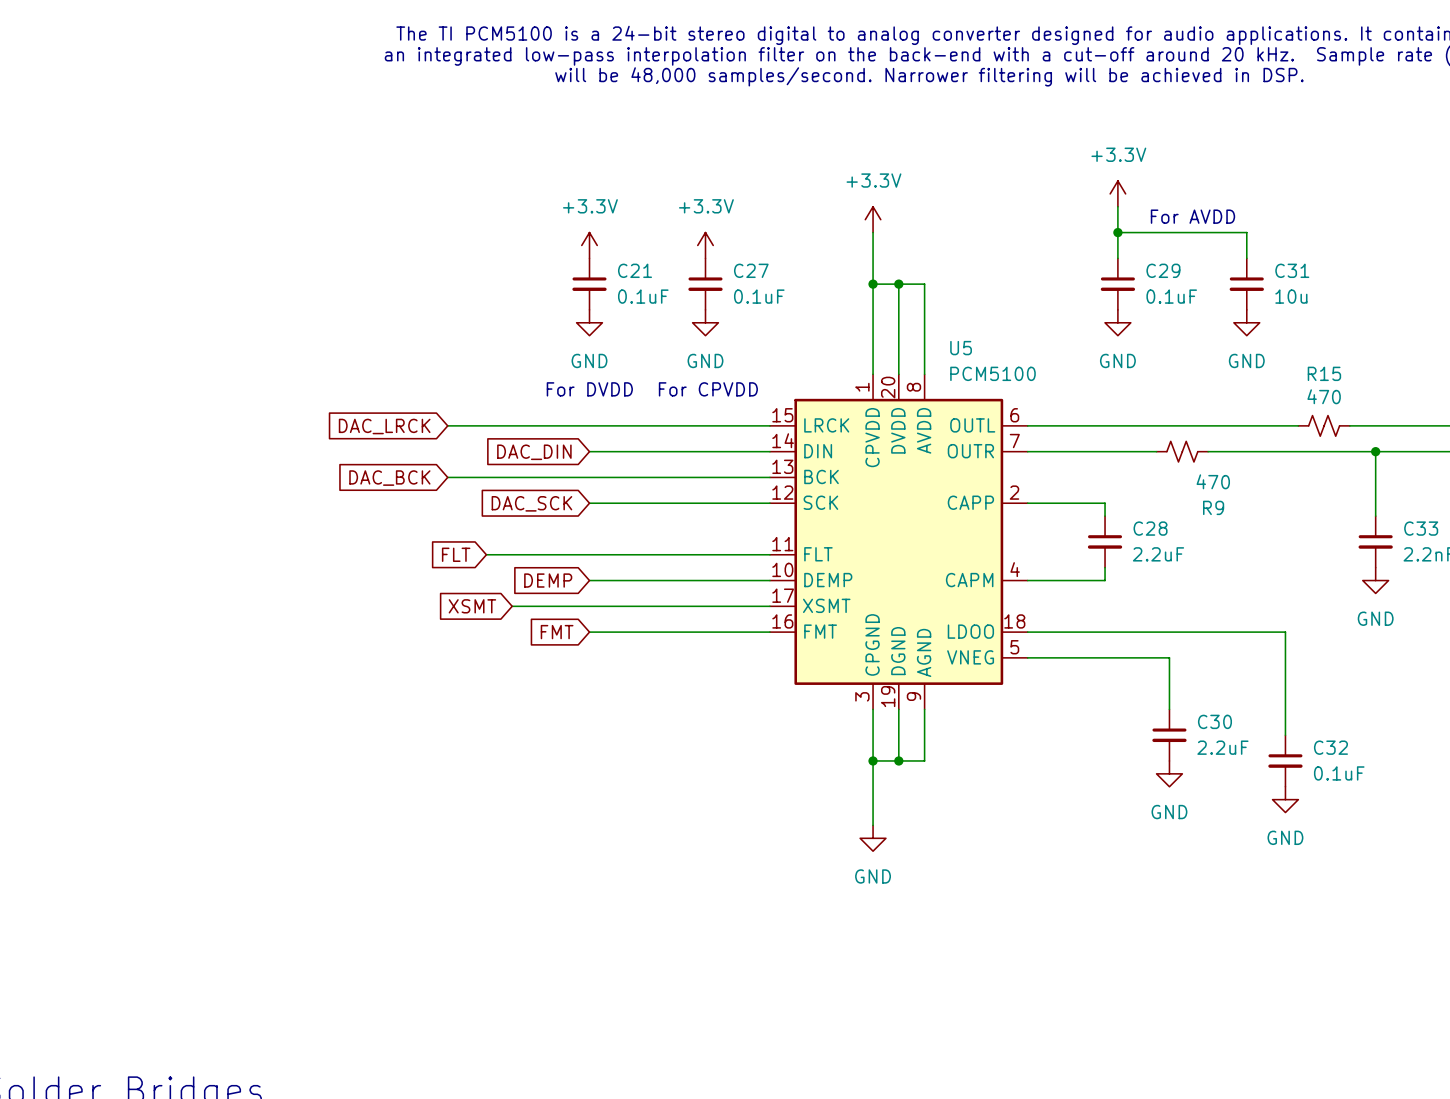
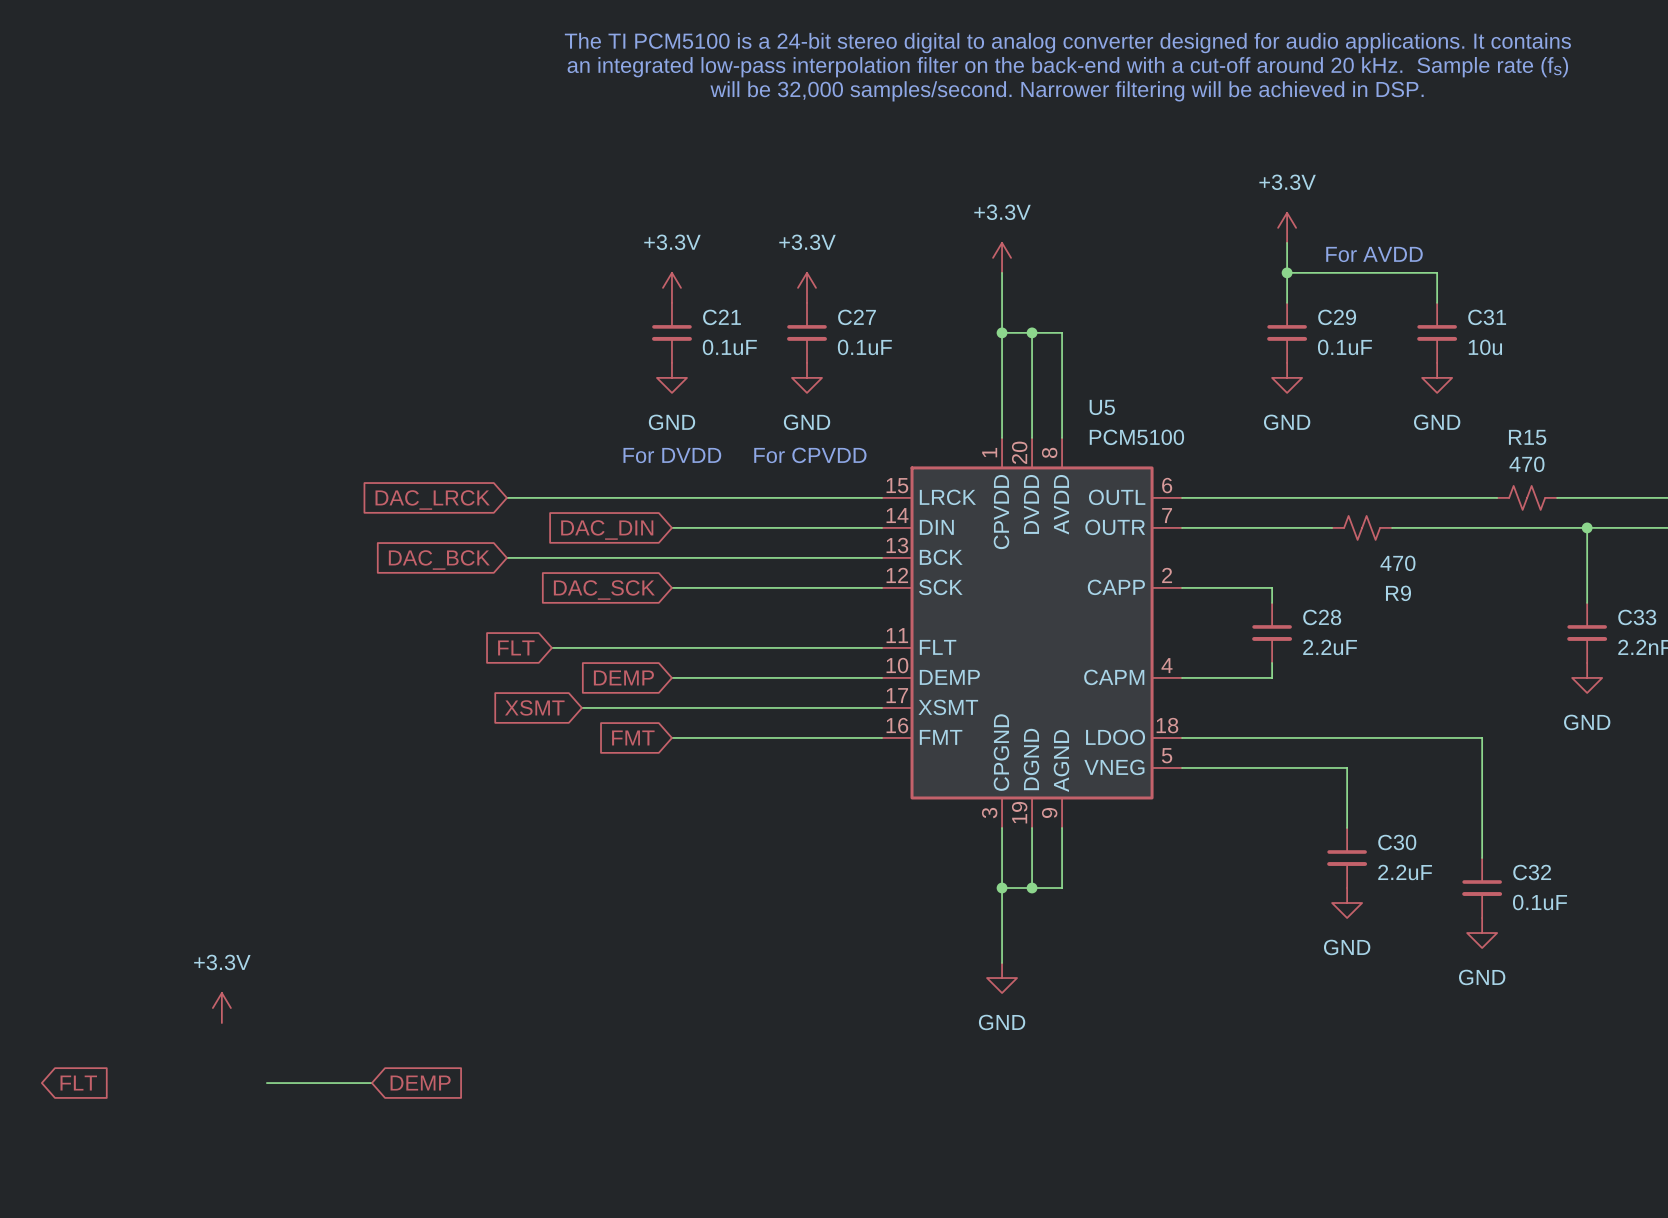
text: will be 48,000 samples/second. Narrower filtering will be achieved in DSP. (929, 76) -> will be 32,000 samples/second. Narrower filtering will be achieved in DSP. (1067, 91)
power symbol: none -> +3.3V (221, 1008)
global label: none -> FLT (78, 1083)
wire: none -> (266, 1083) (371, 1083)
global label: none -> DEMP (420, 1083)

